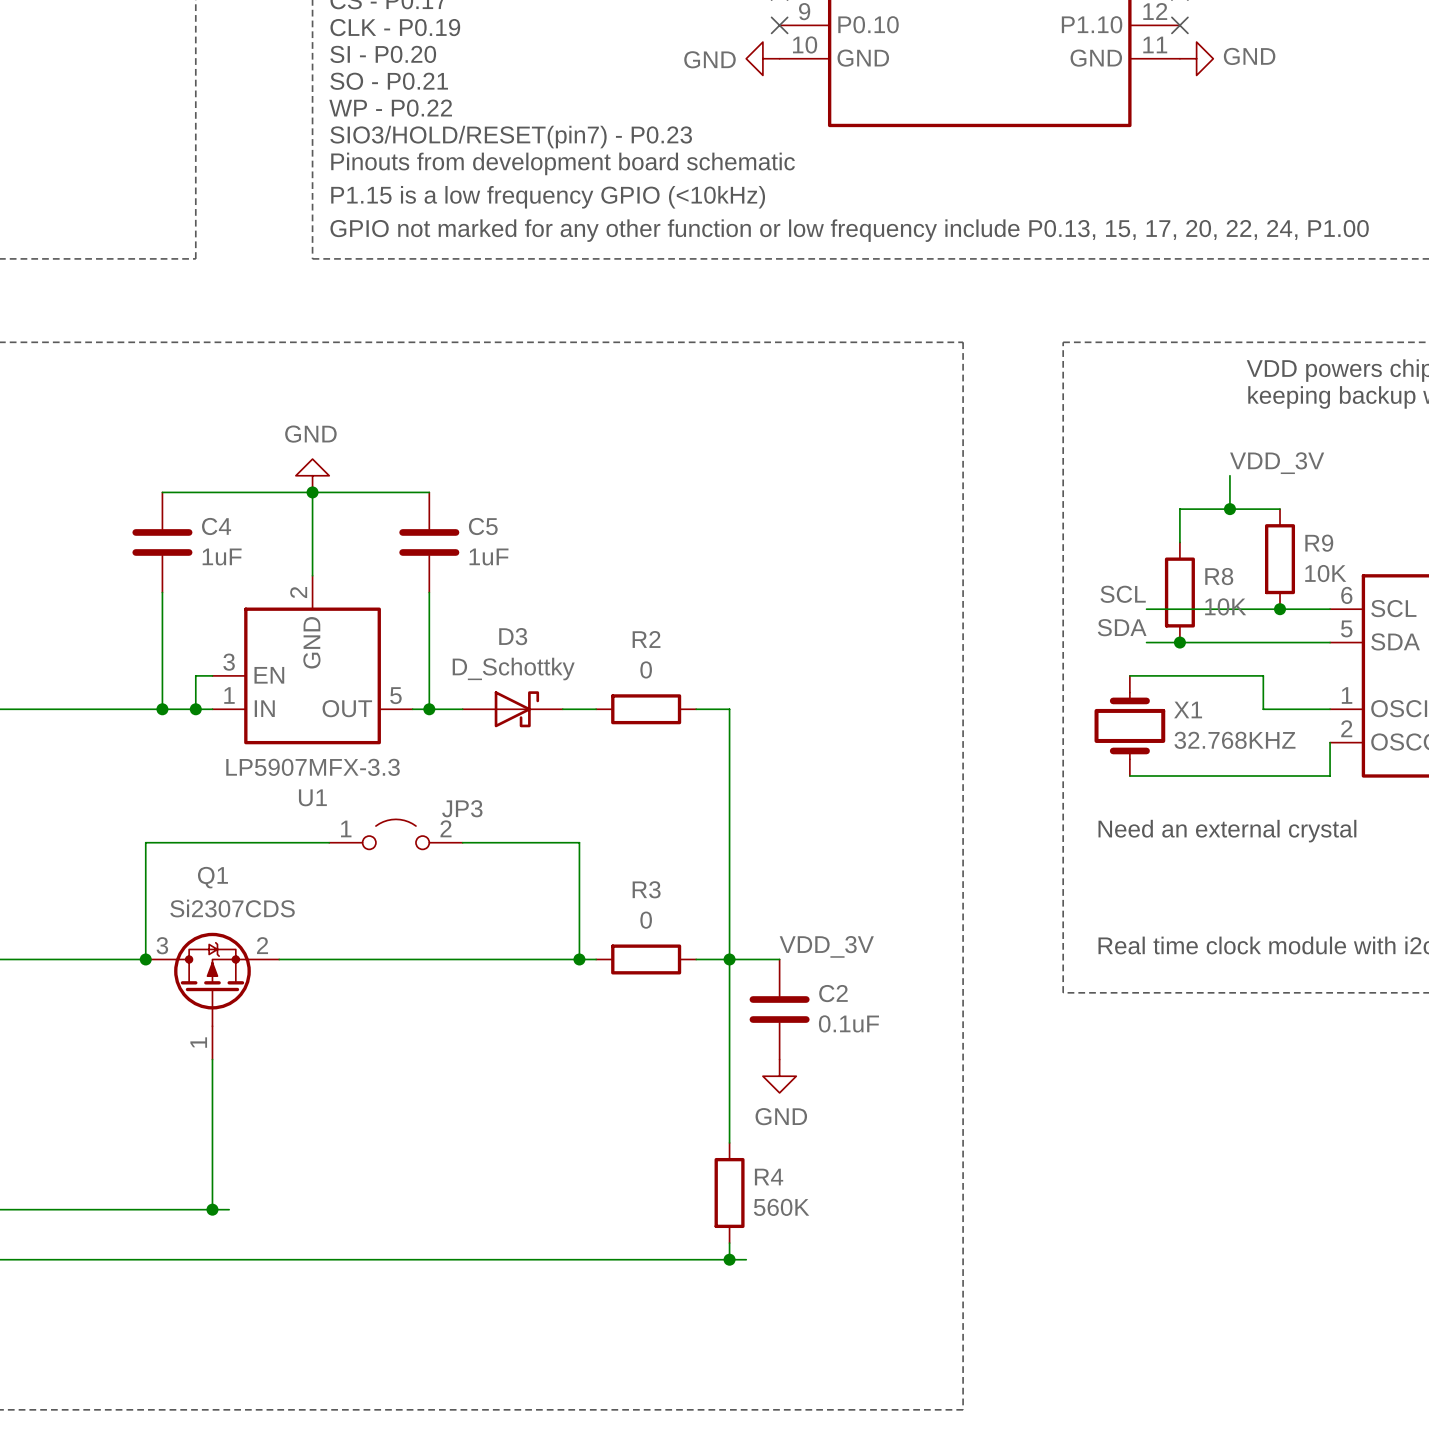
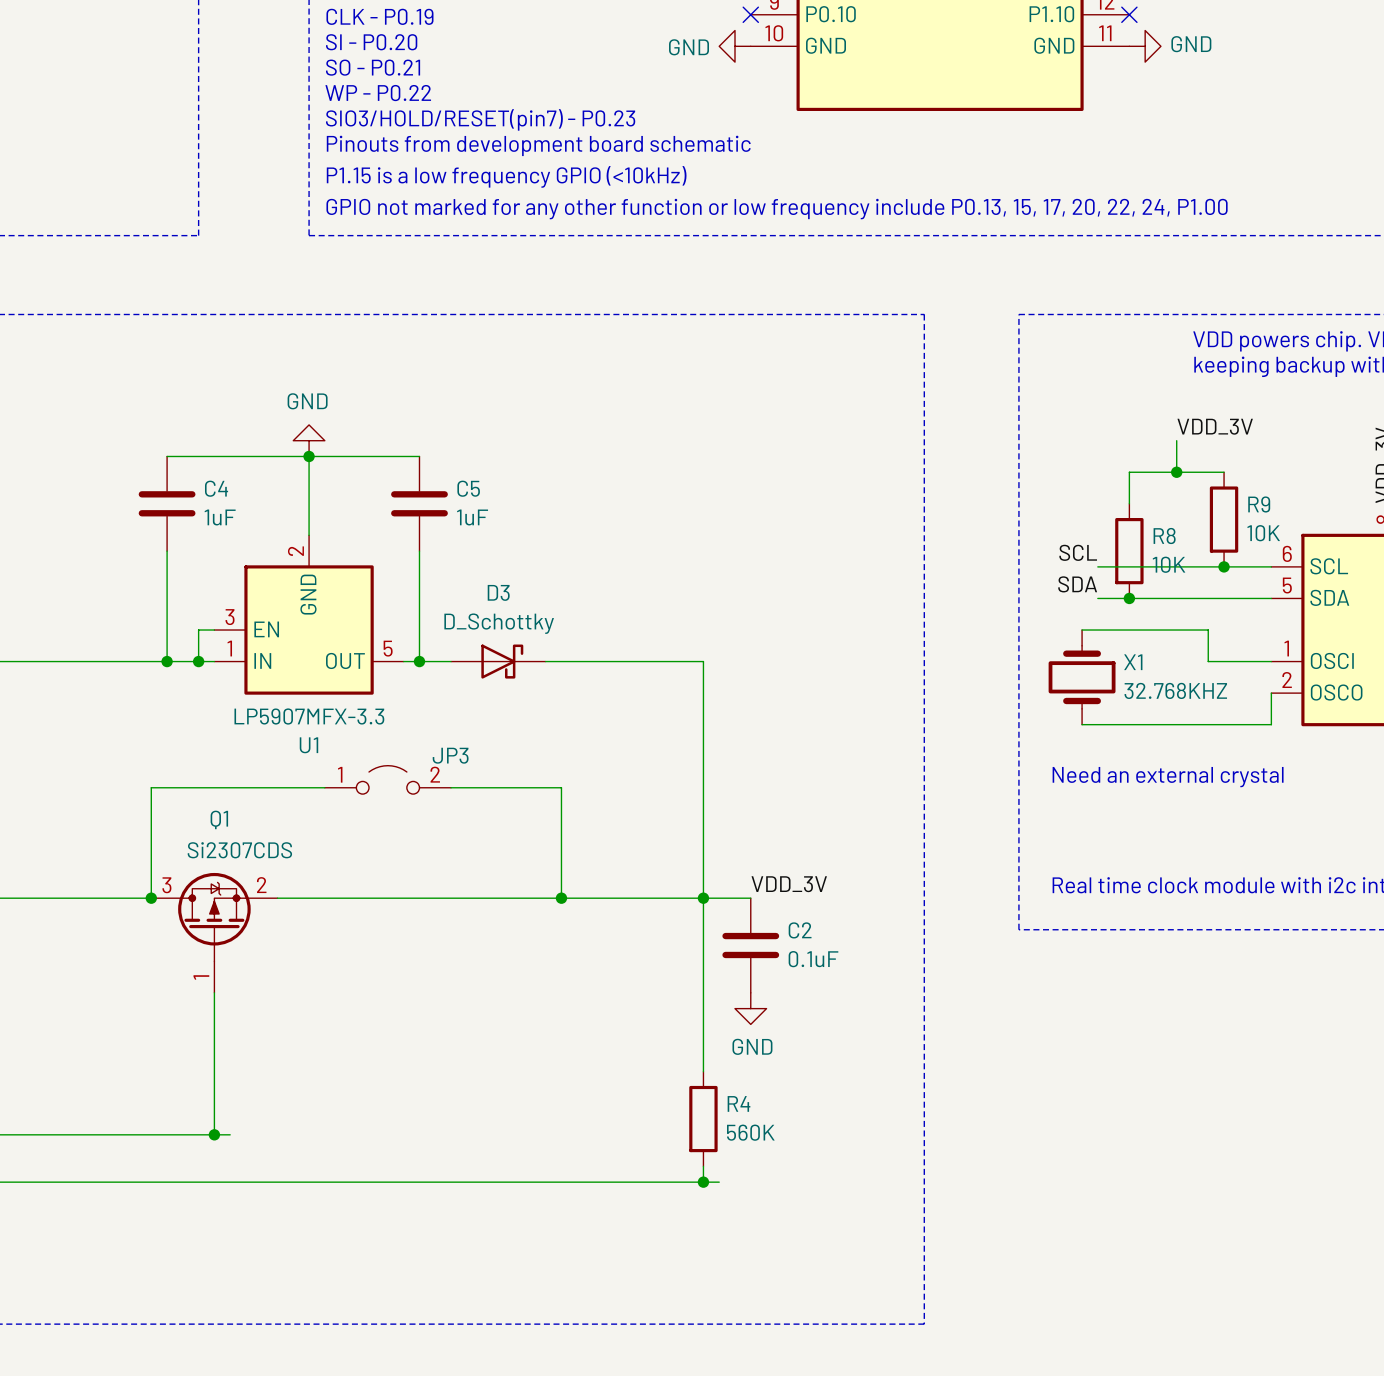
wire: none -> (577, 661) (671, 661)
R2: 0 (646, 709) -> none
wire: none -> (577, 898) (671, 898)
R3: 0 (646, 959) -> none

